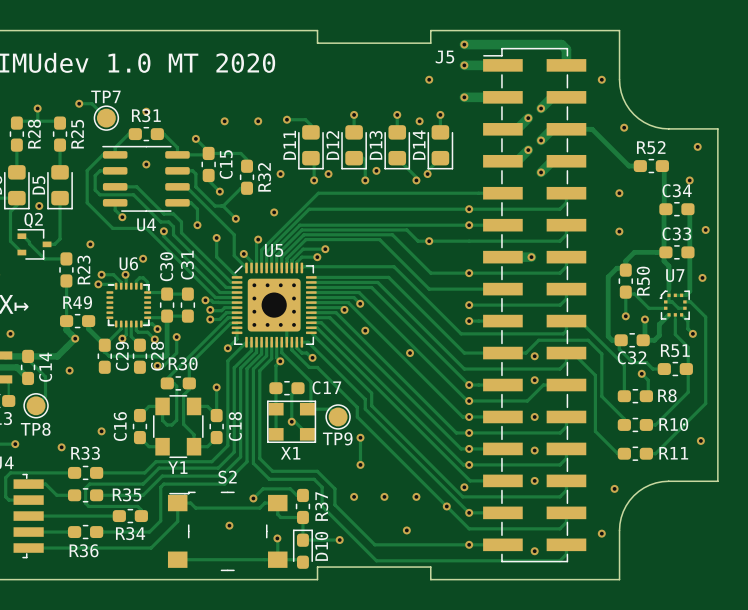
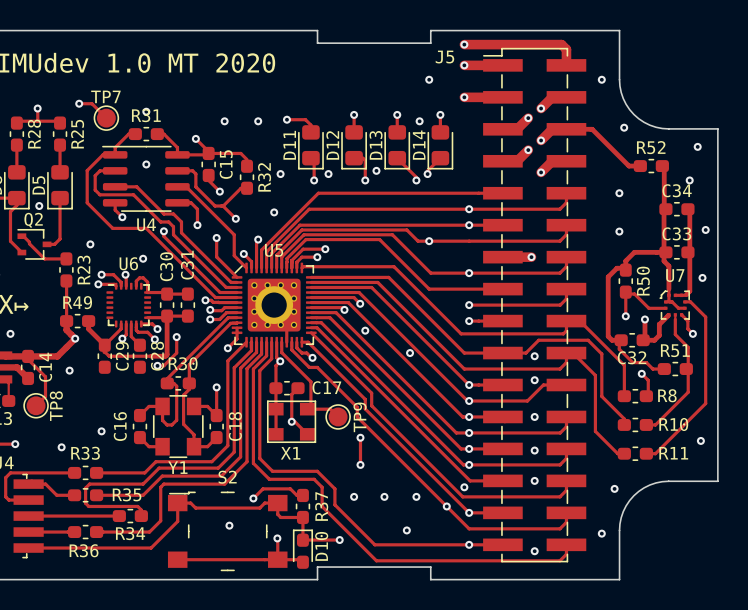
TP8 name rotation: 0° (35, 429) -> 90° counterclockwise (56, 406)
TP9 name rotation: 0° (337, 438) -> 90° counterclockwise (360, 417)

